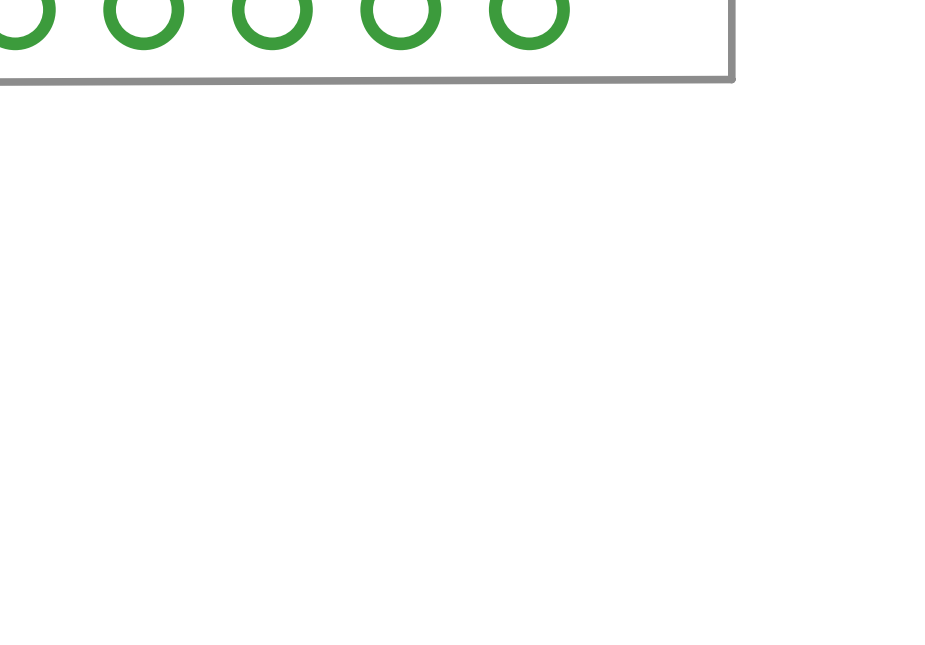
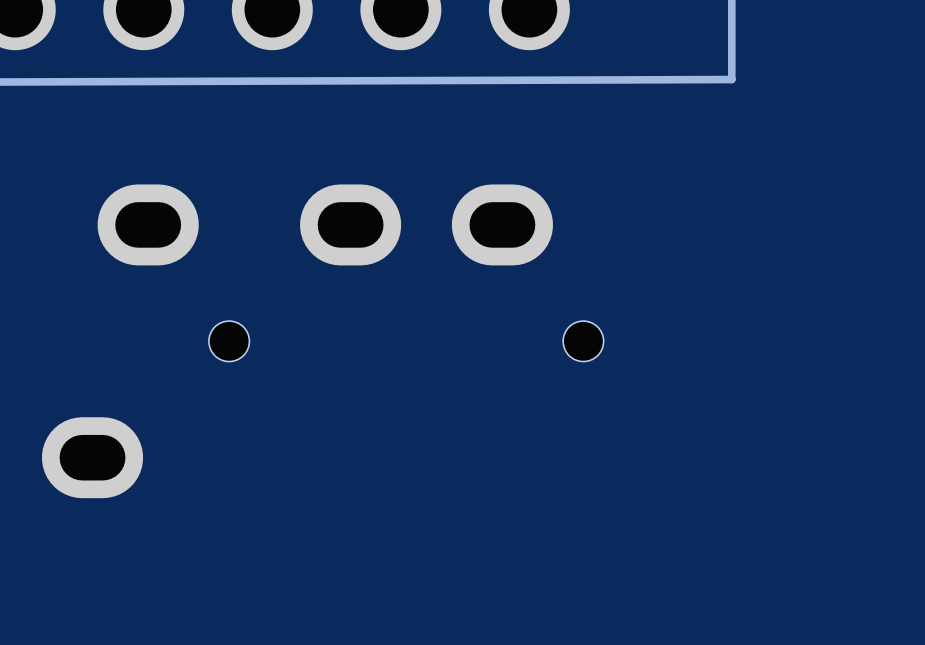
part: none -> (322, 341)

